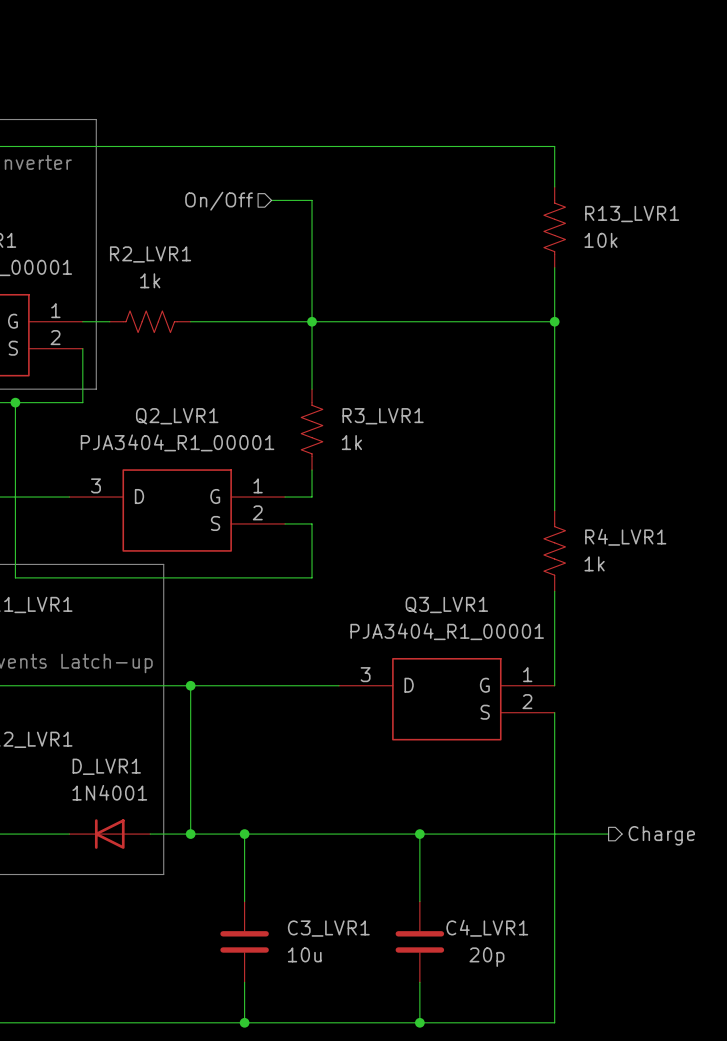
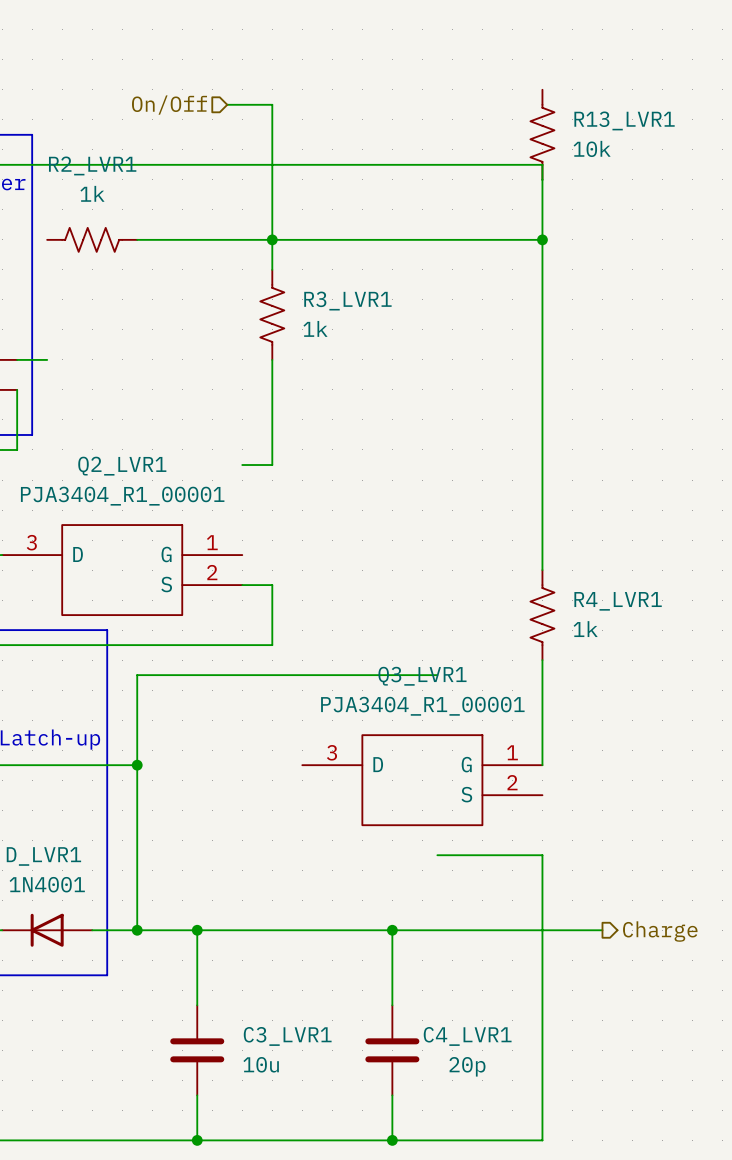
wire: (271, 200) (312, 200) -> (227, 104) (272, 104) (272, 224)
hierarchical label position: On/Off (219, 201) -> On/Off (169, 105)
junction: none -> (272, 239)
junction: none -> (542, 239)
R13_LVR1 position: (554, 227) -> (542, 134)
R2_LVR1 position: (150, 321) -> (92, 239)
wire: (190, 321) (554, 321) -> (137, 239) (542, 239)
junction: (312, 321) -> none
junction: (554, 321) -> none
R3_LVR1 position: (312, 429) -> (272, 314)
wire: (312, 470) (312, 497) (285, 497) -> (272, 434) (272, 465) (242, 465)
wire: (190, 685) (338, 685) -> (137, 765) (137, 675) (437, 675)
wire: (554, 712) (554, 766) -> (437, 855) (542, 855)

